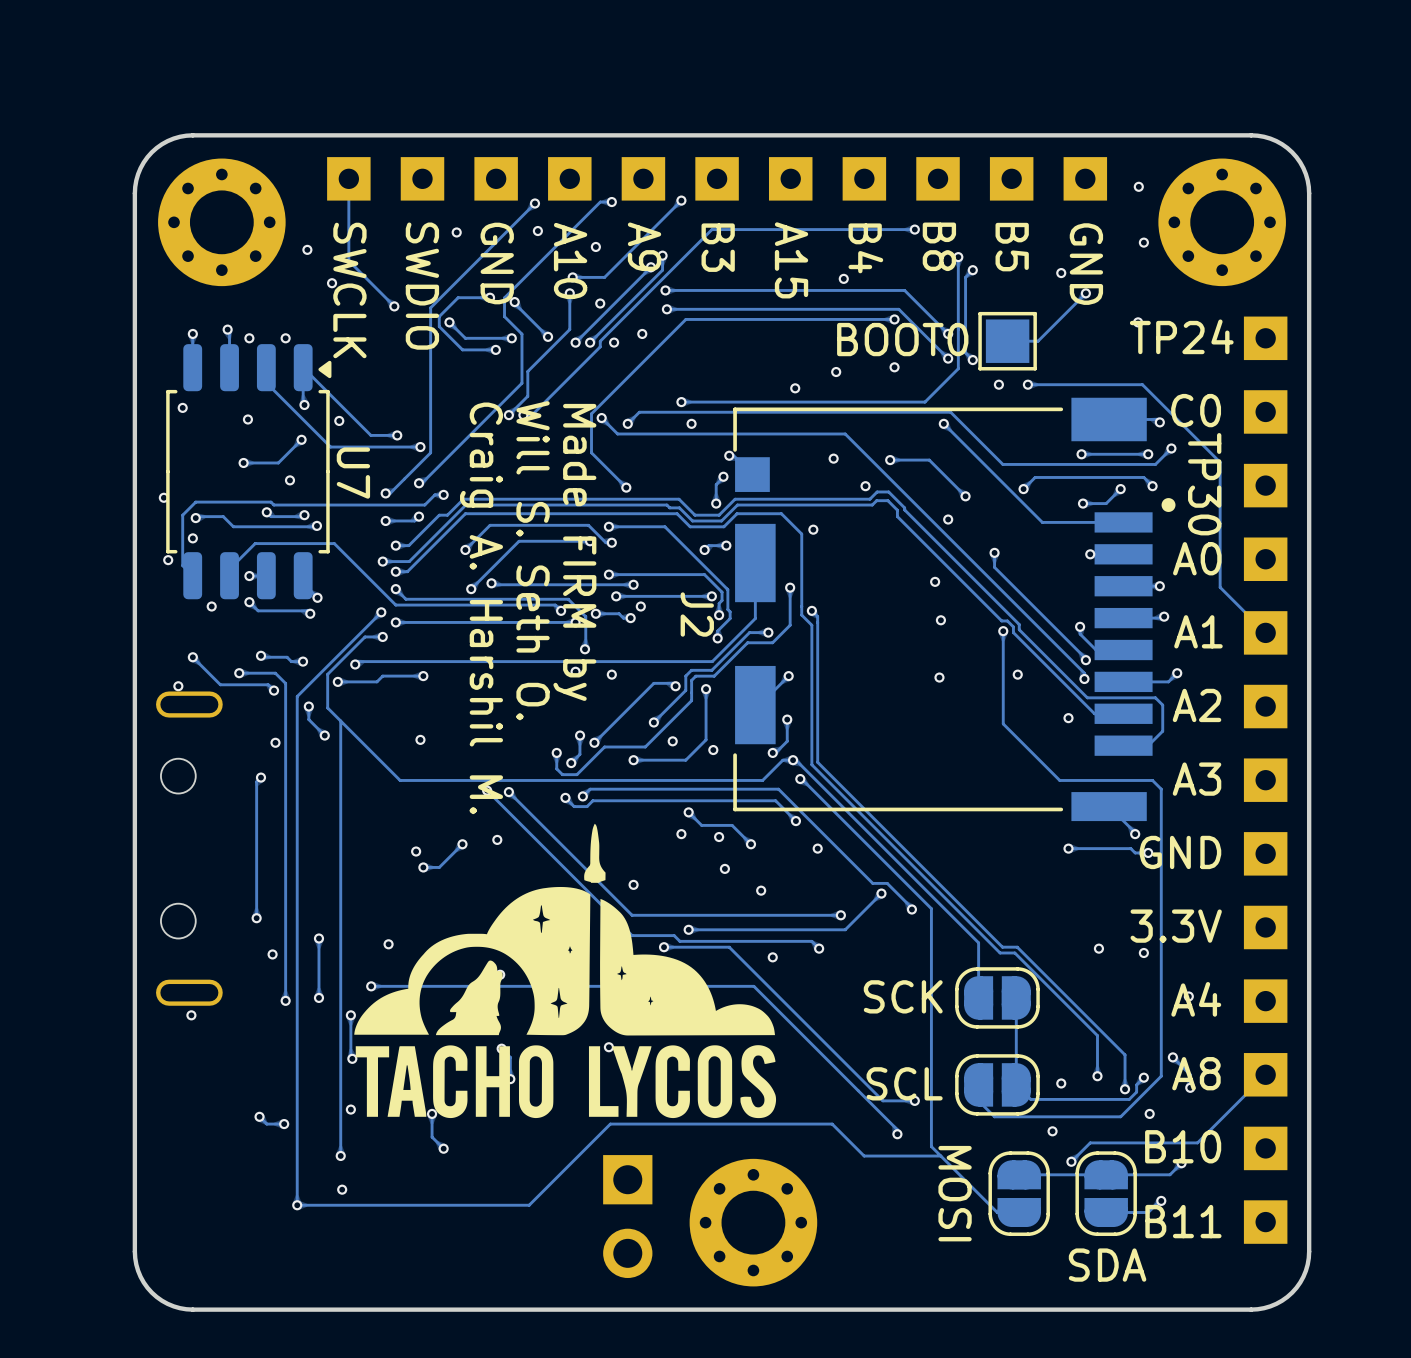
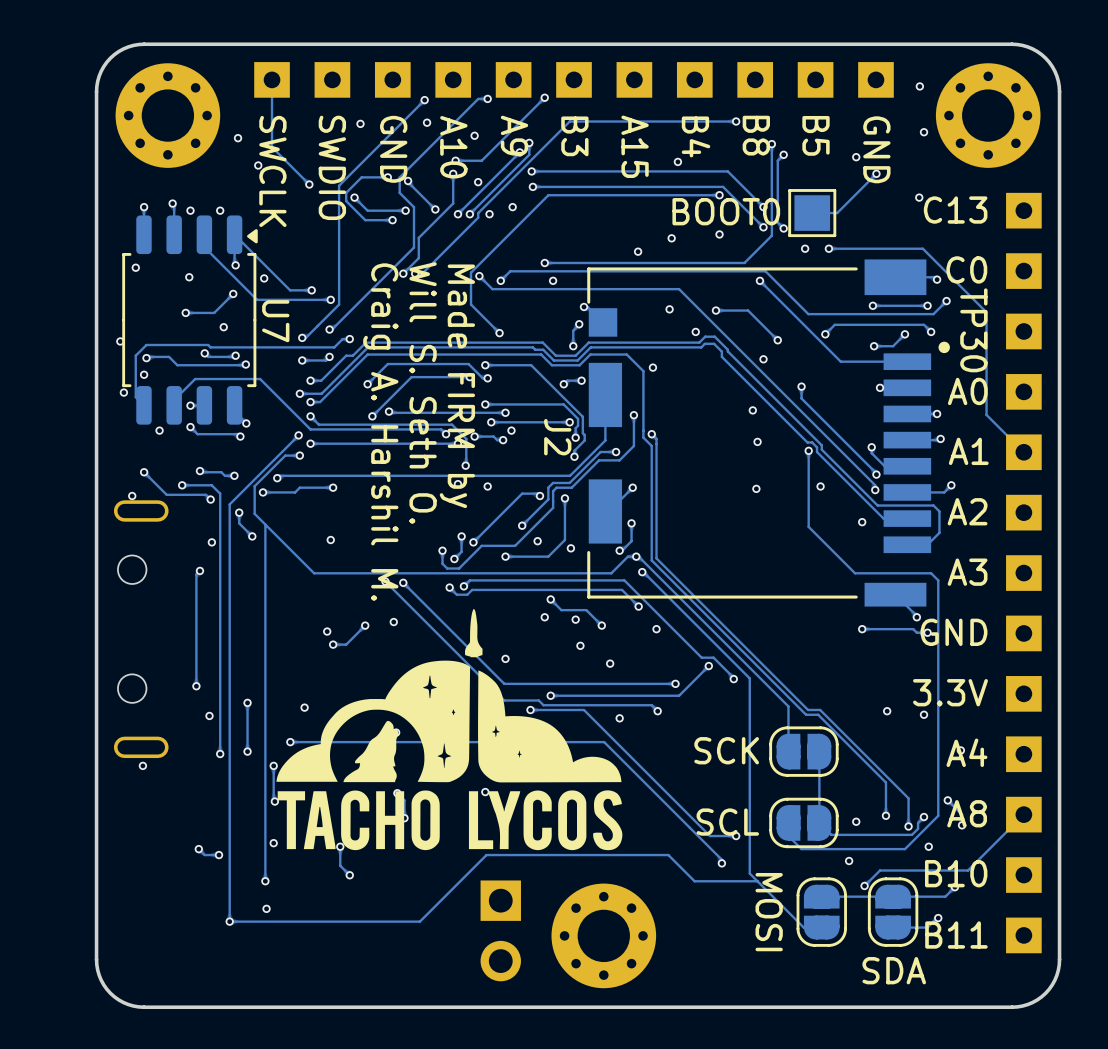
TP24 name: TP24 (1181, 336) -> C13 (955, 210)

